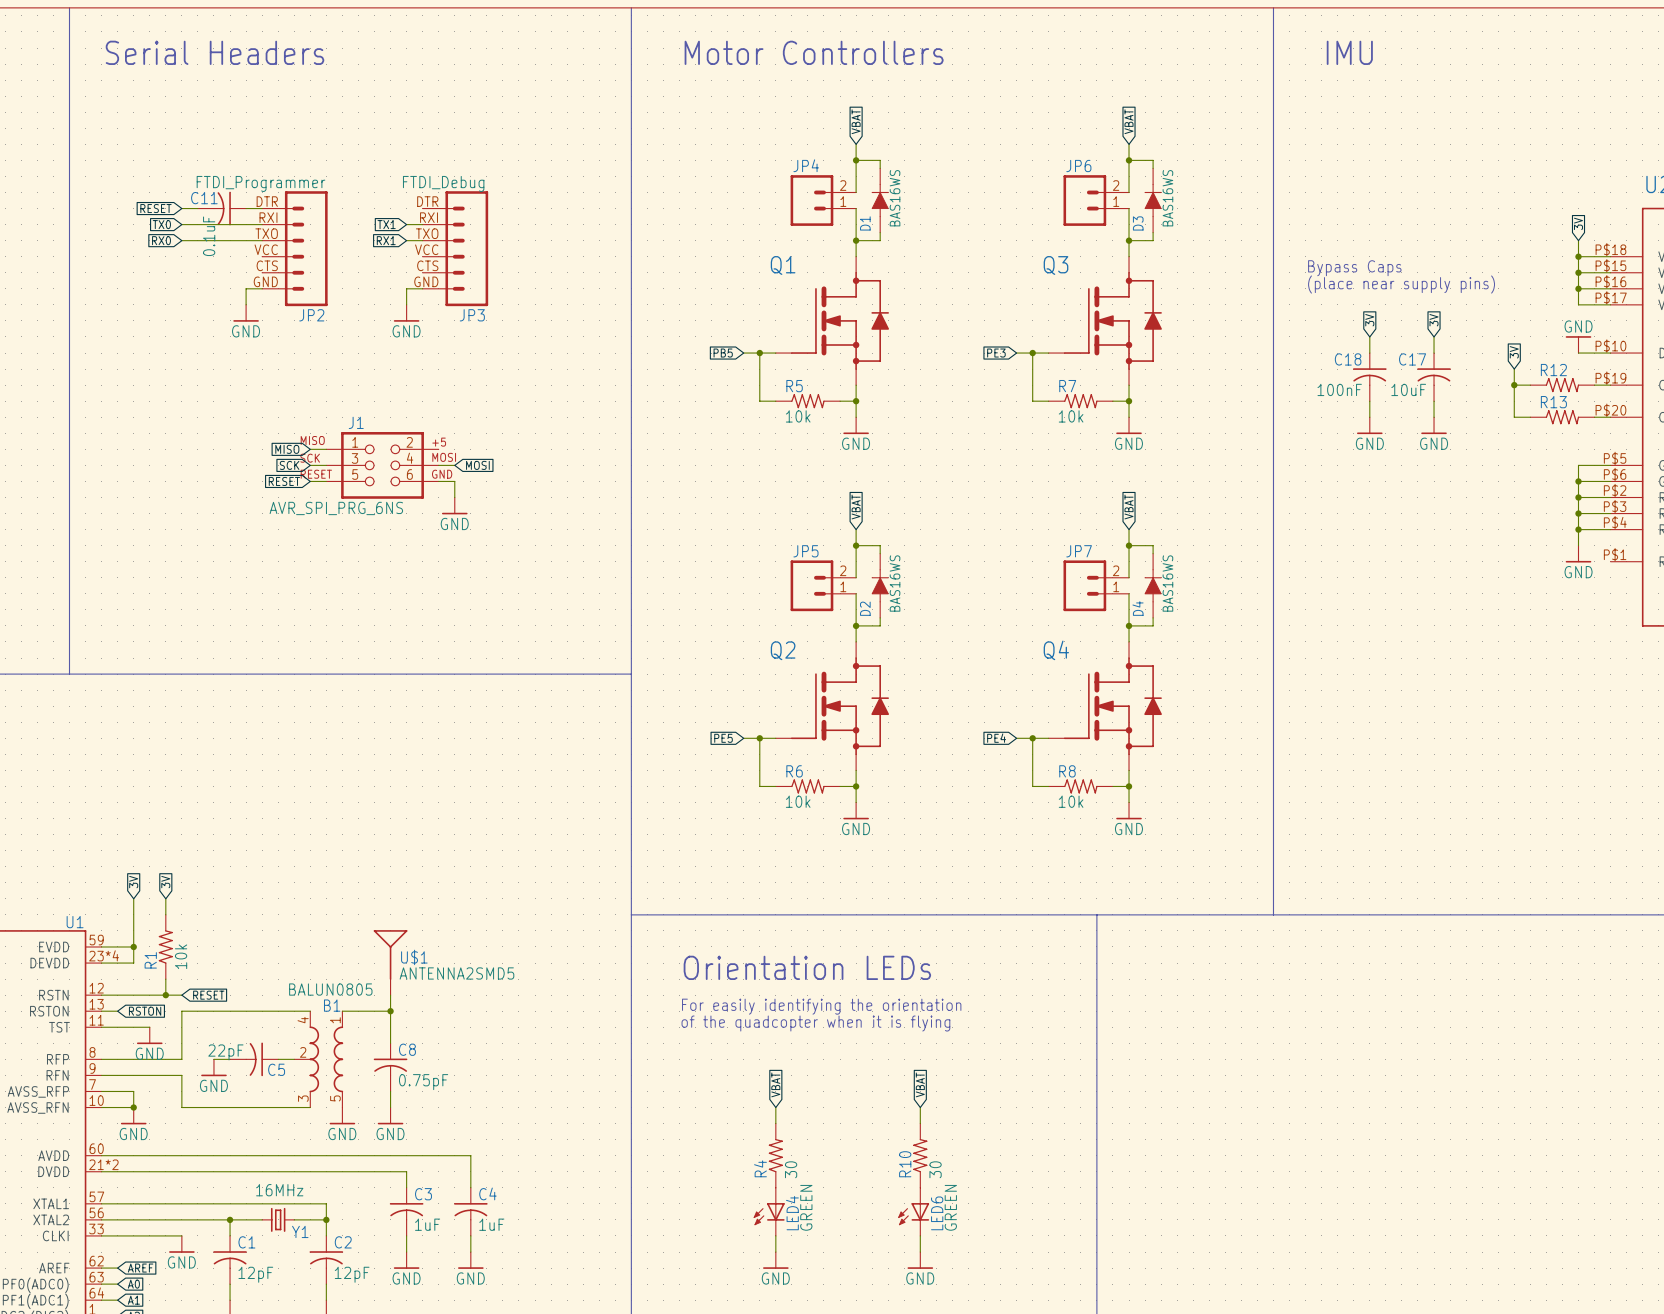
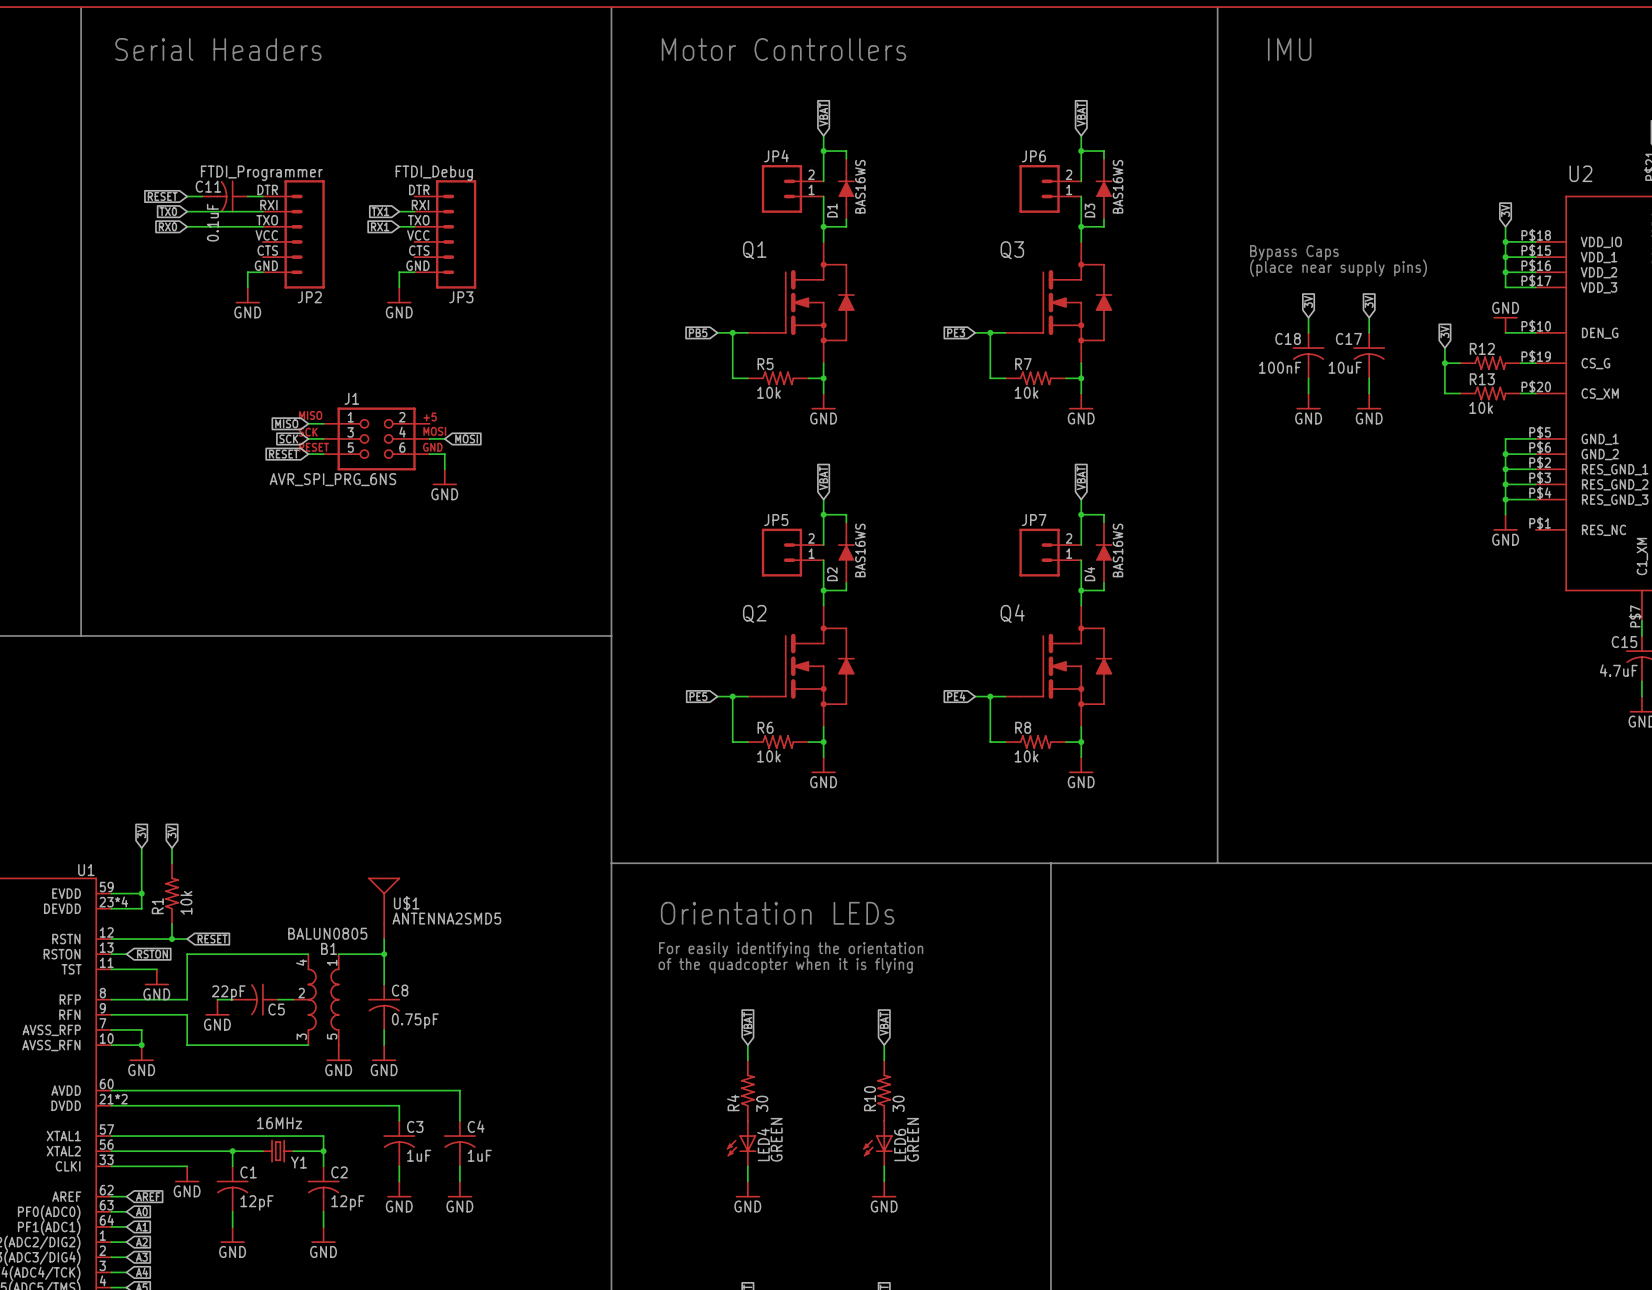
R13 value: none -> 10k (1481, 407)

